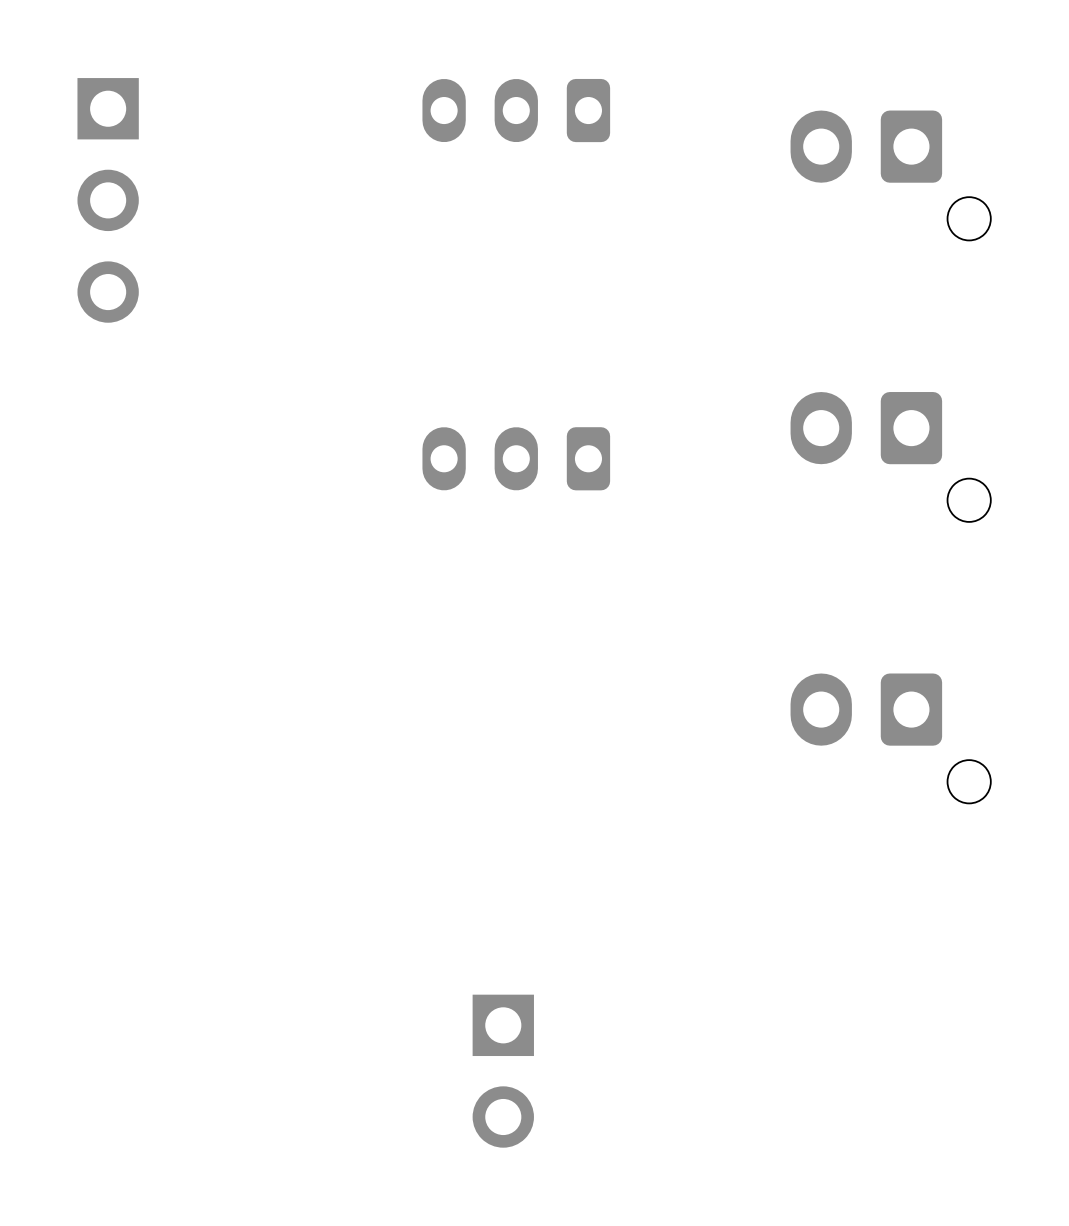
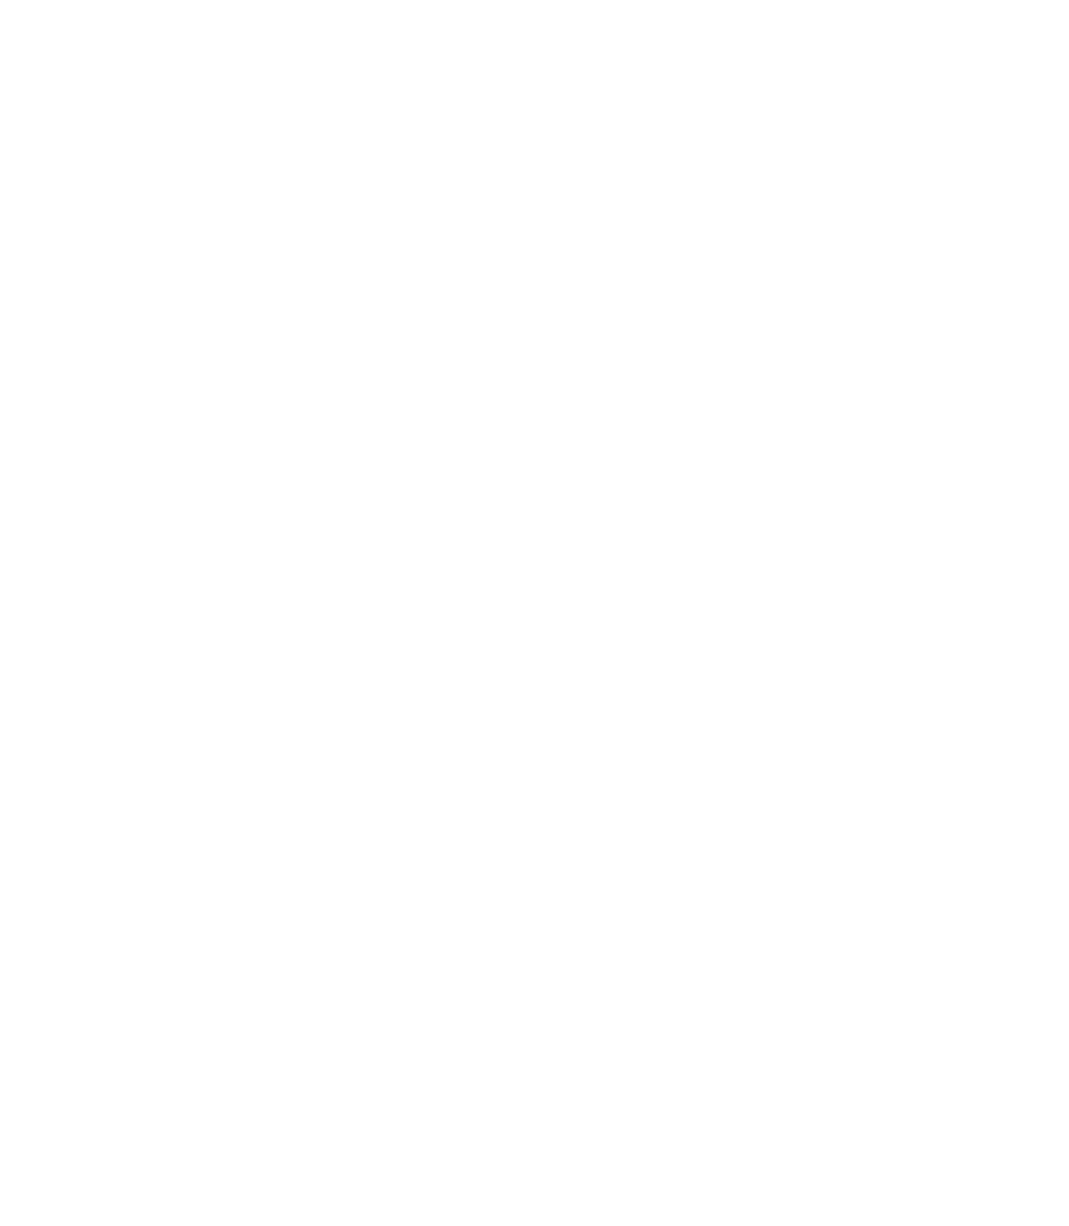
part: (516, 110) -> none
part: (890, 175) -> none
part: (108, 200) -> none
part: (890, 456) -> none
part: (516, 458) -> none
part: (890, 738) -> none
part: (503, 1071) -> none

